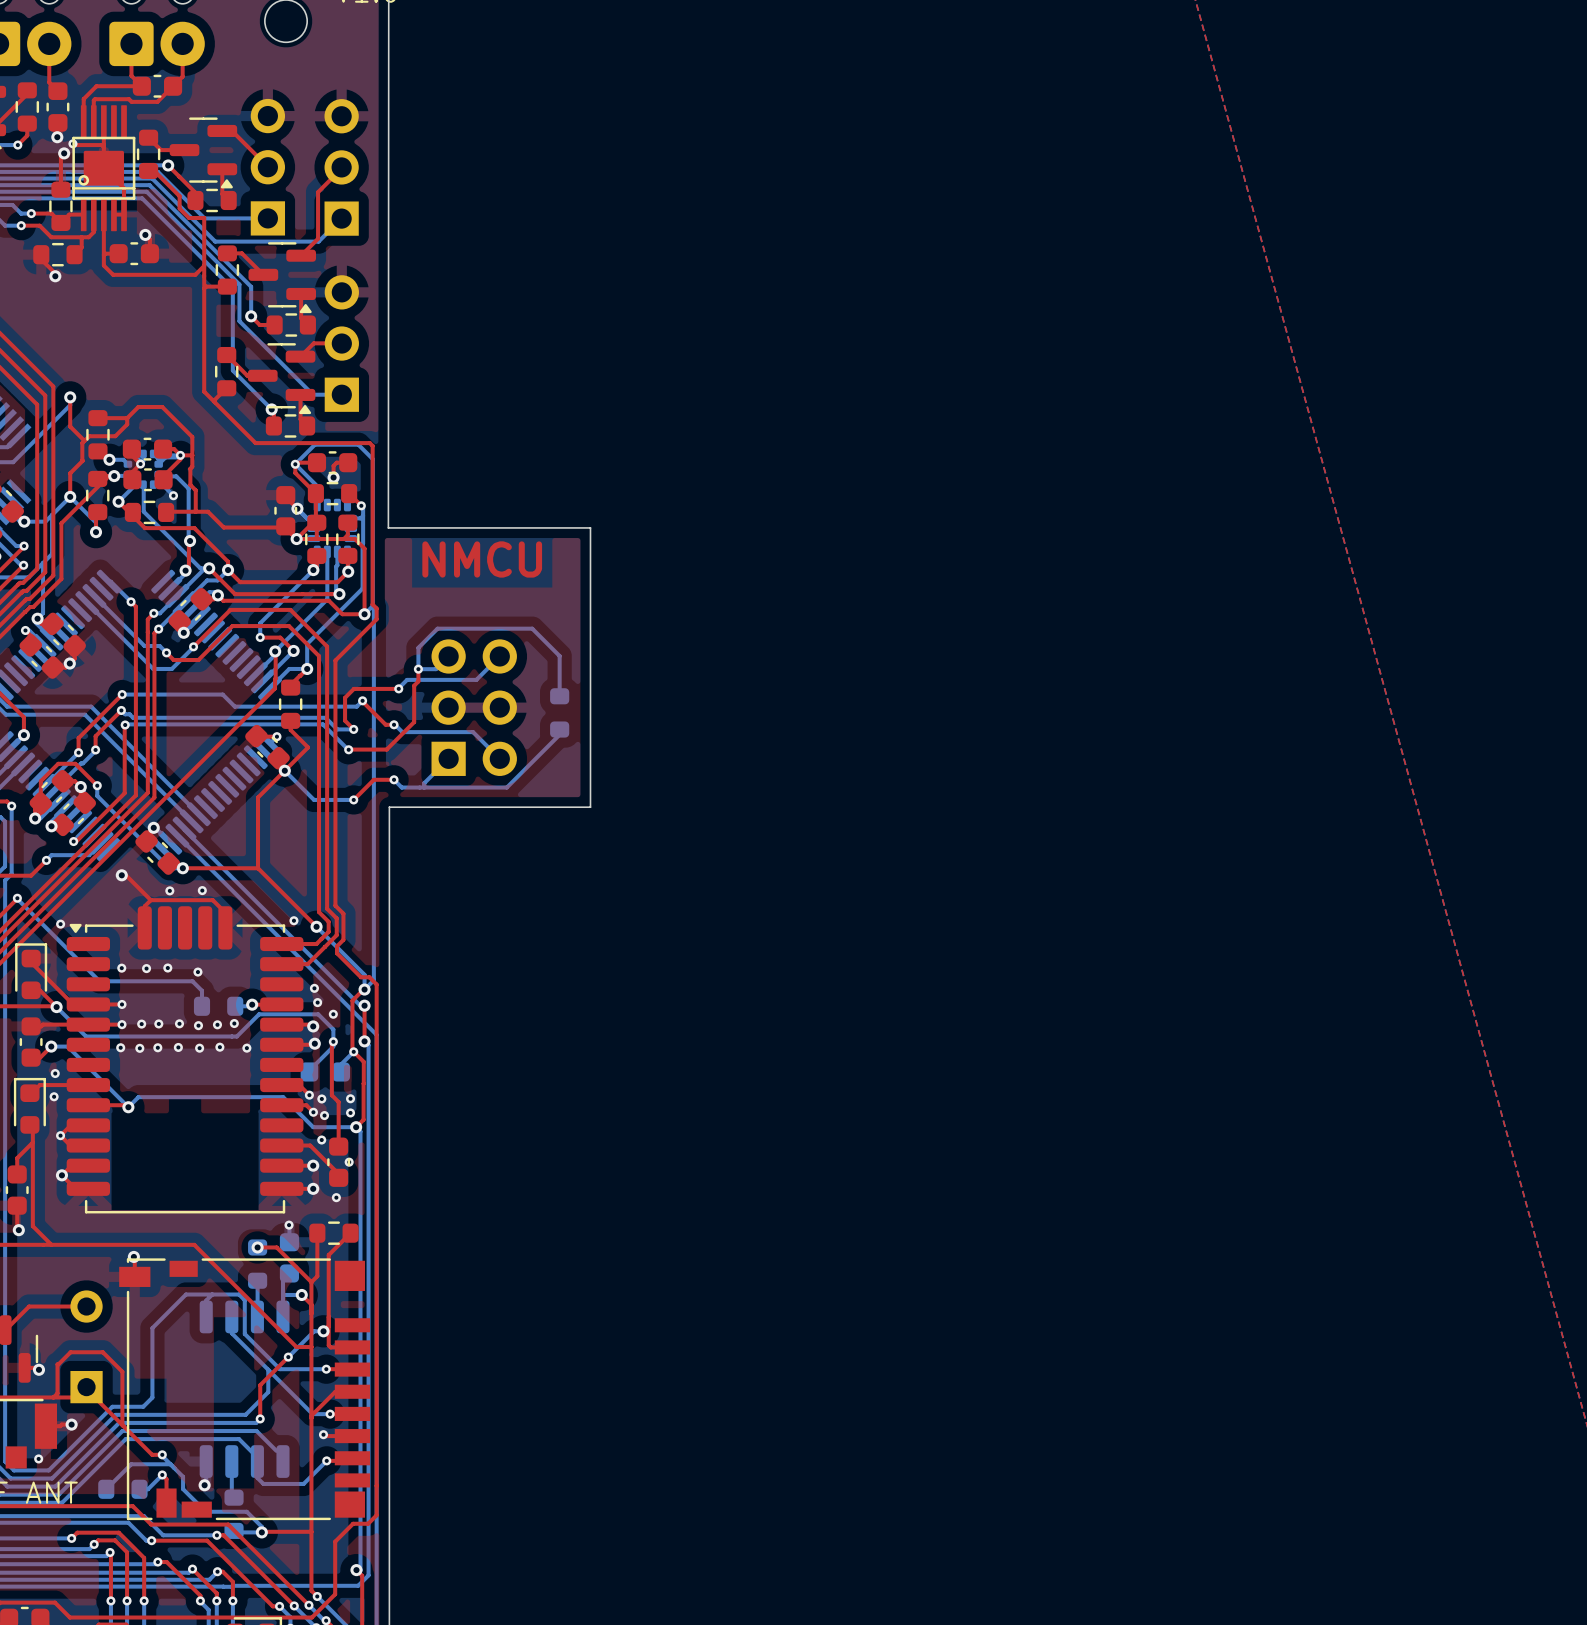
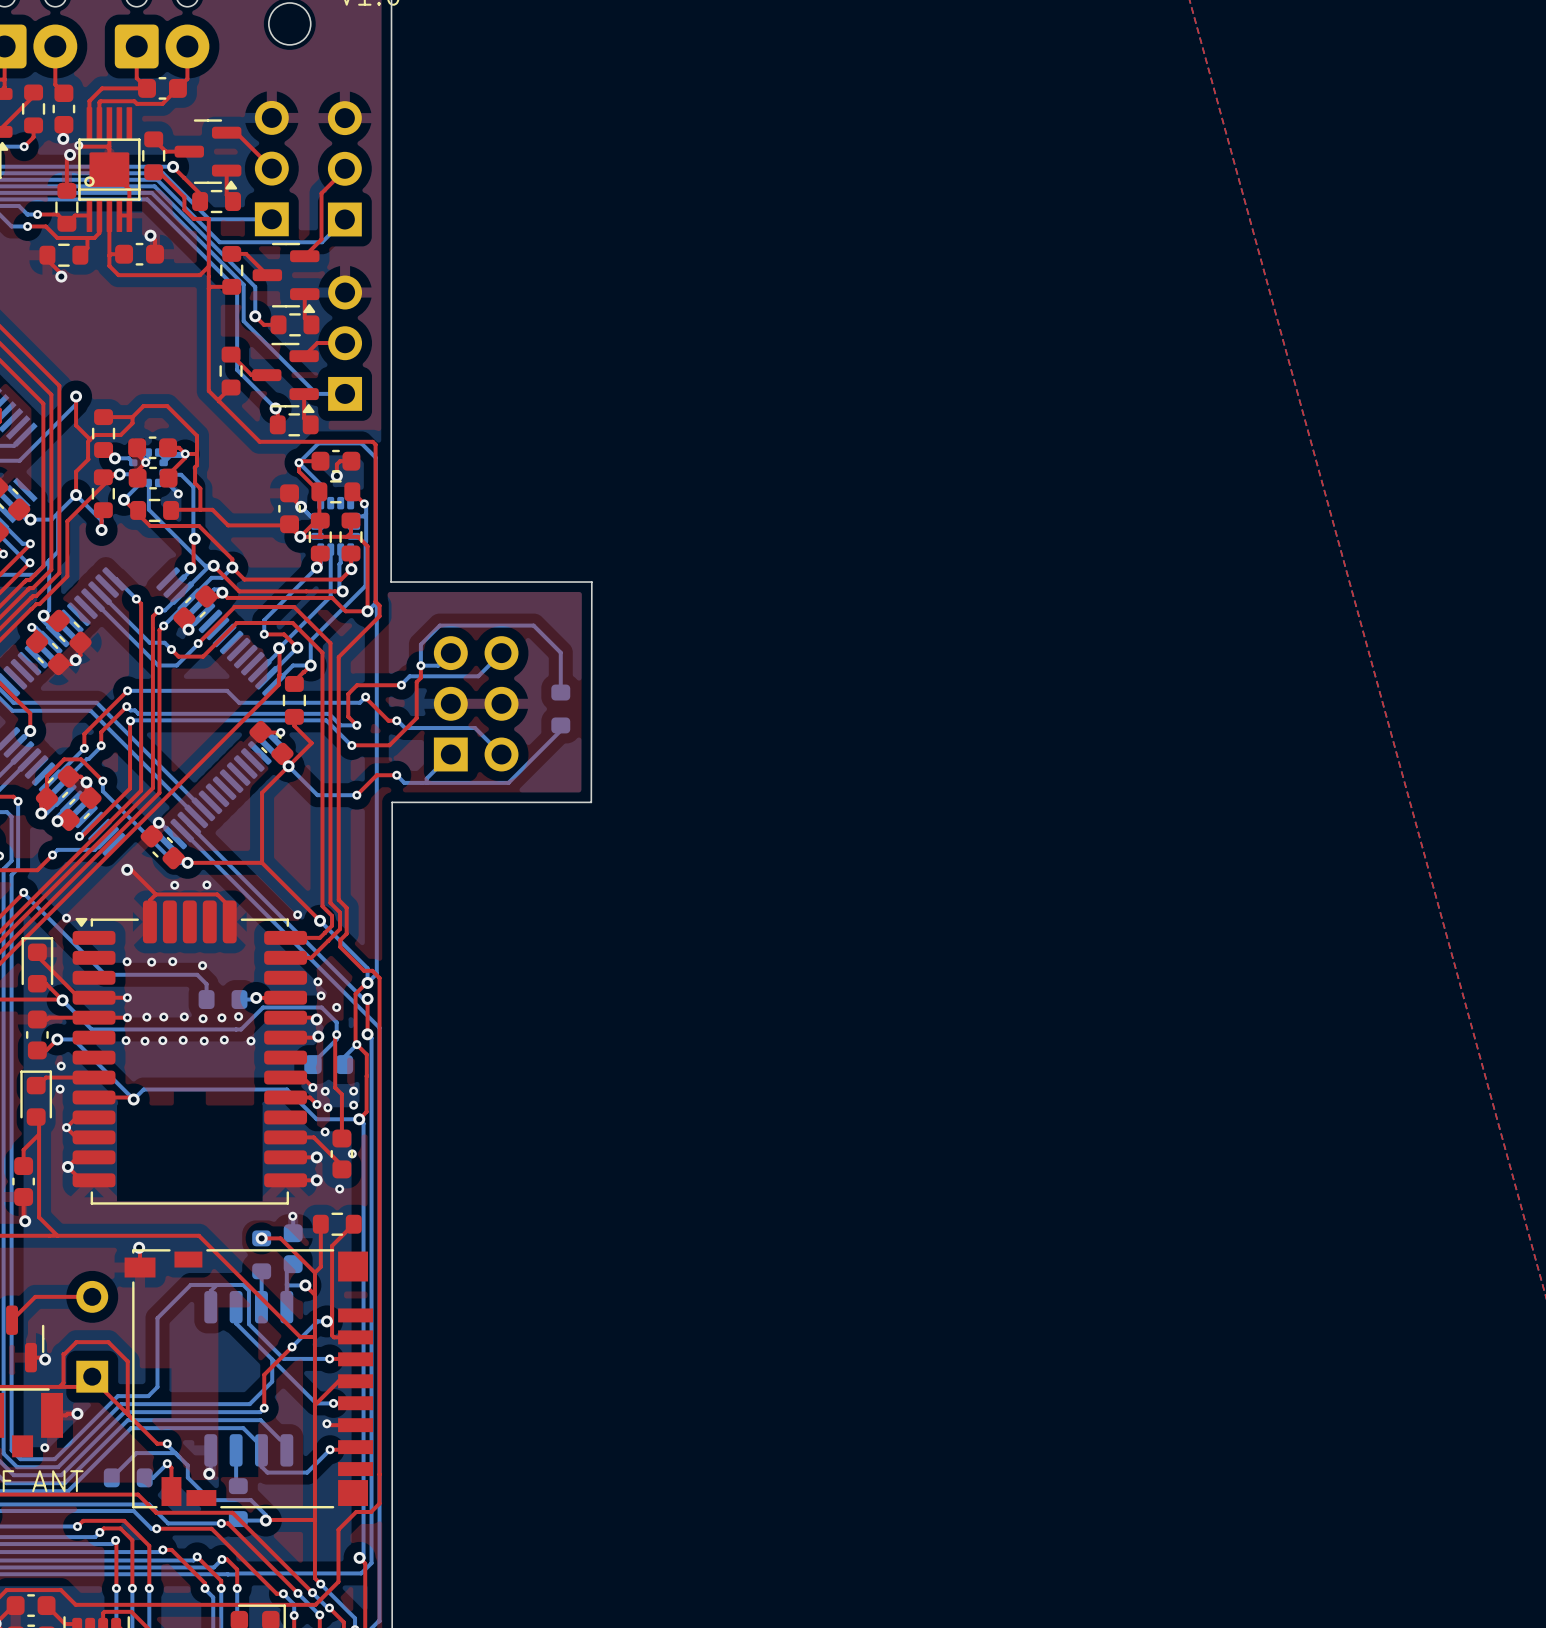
board edge: (388, 527) (590, 527) (590, 807) -> (391, 525) (391, 582) (591, 582) (591, 802)
text: NMCU (482, 559) -> none

